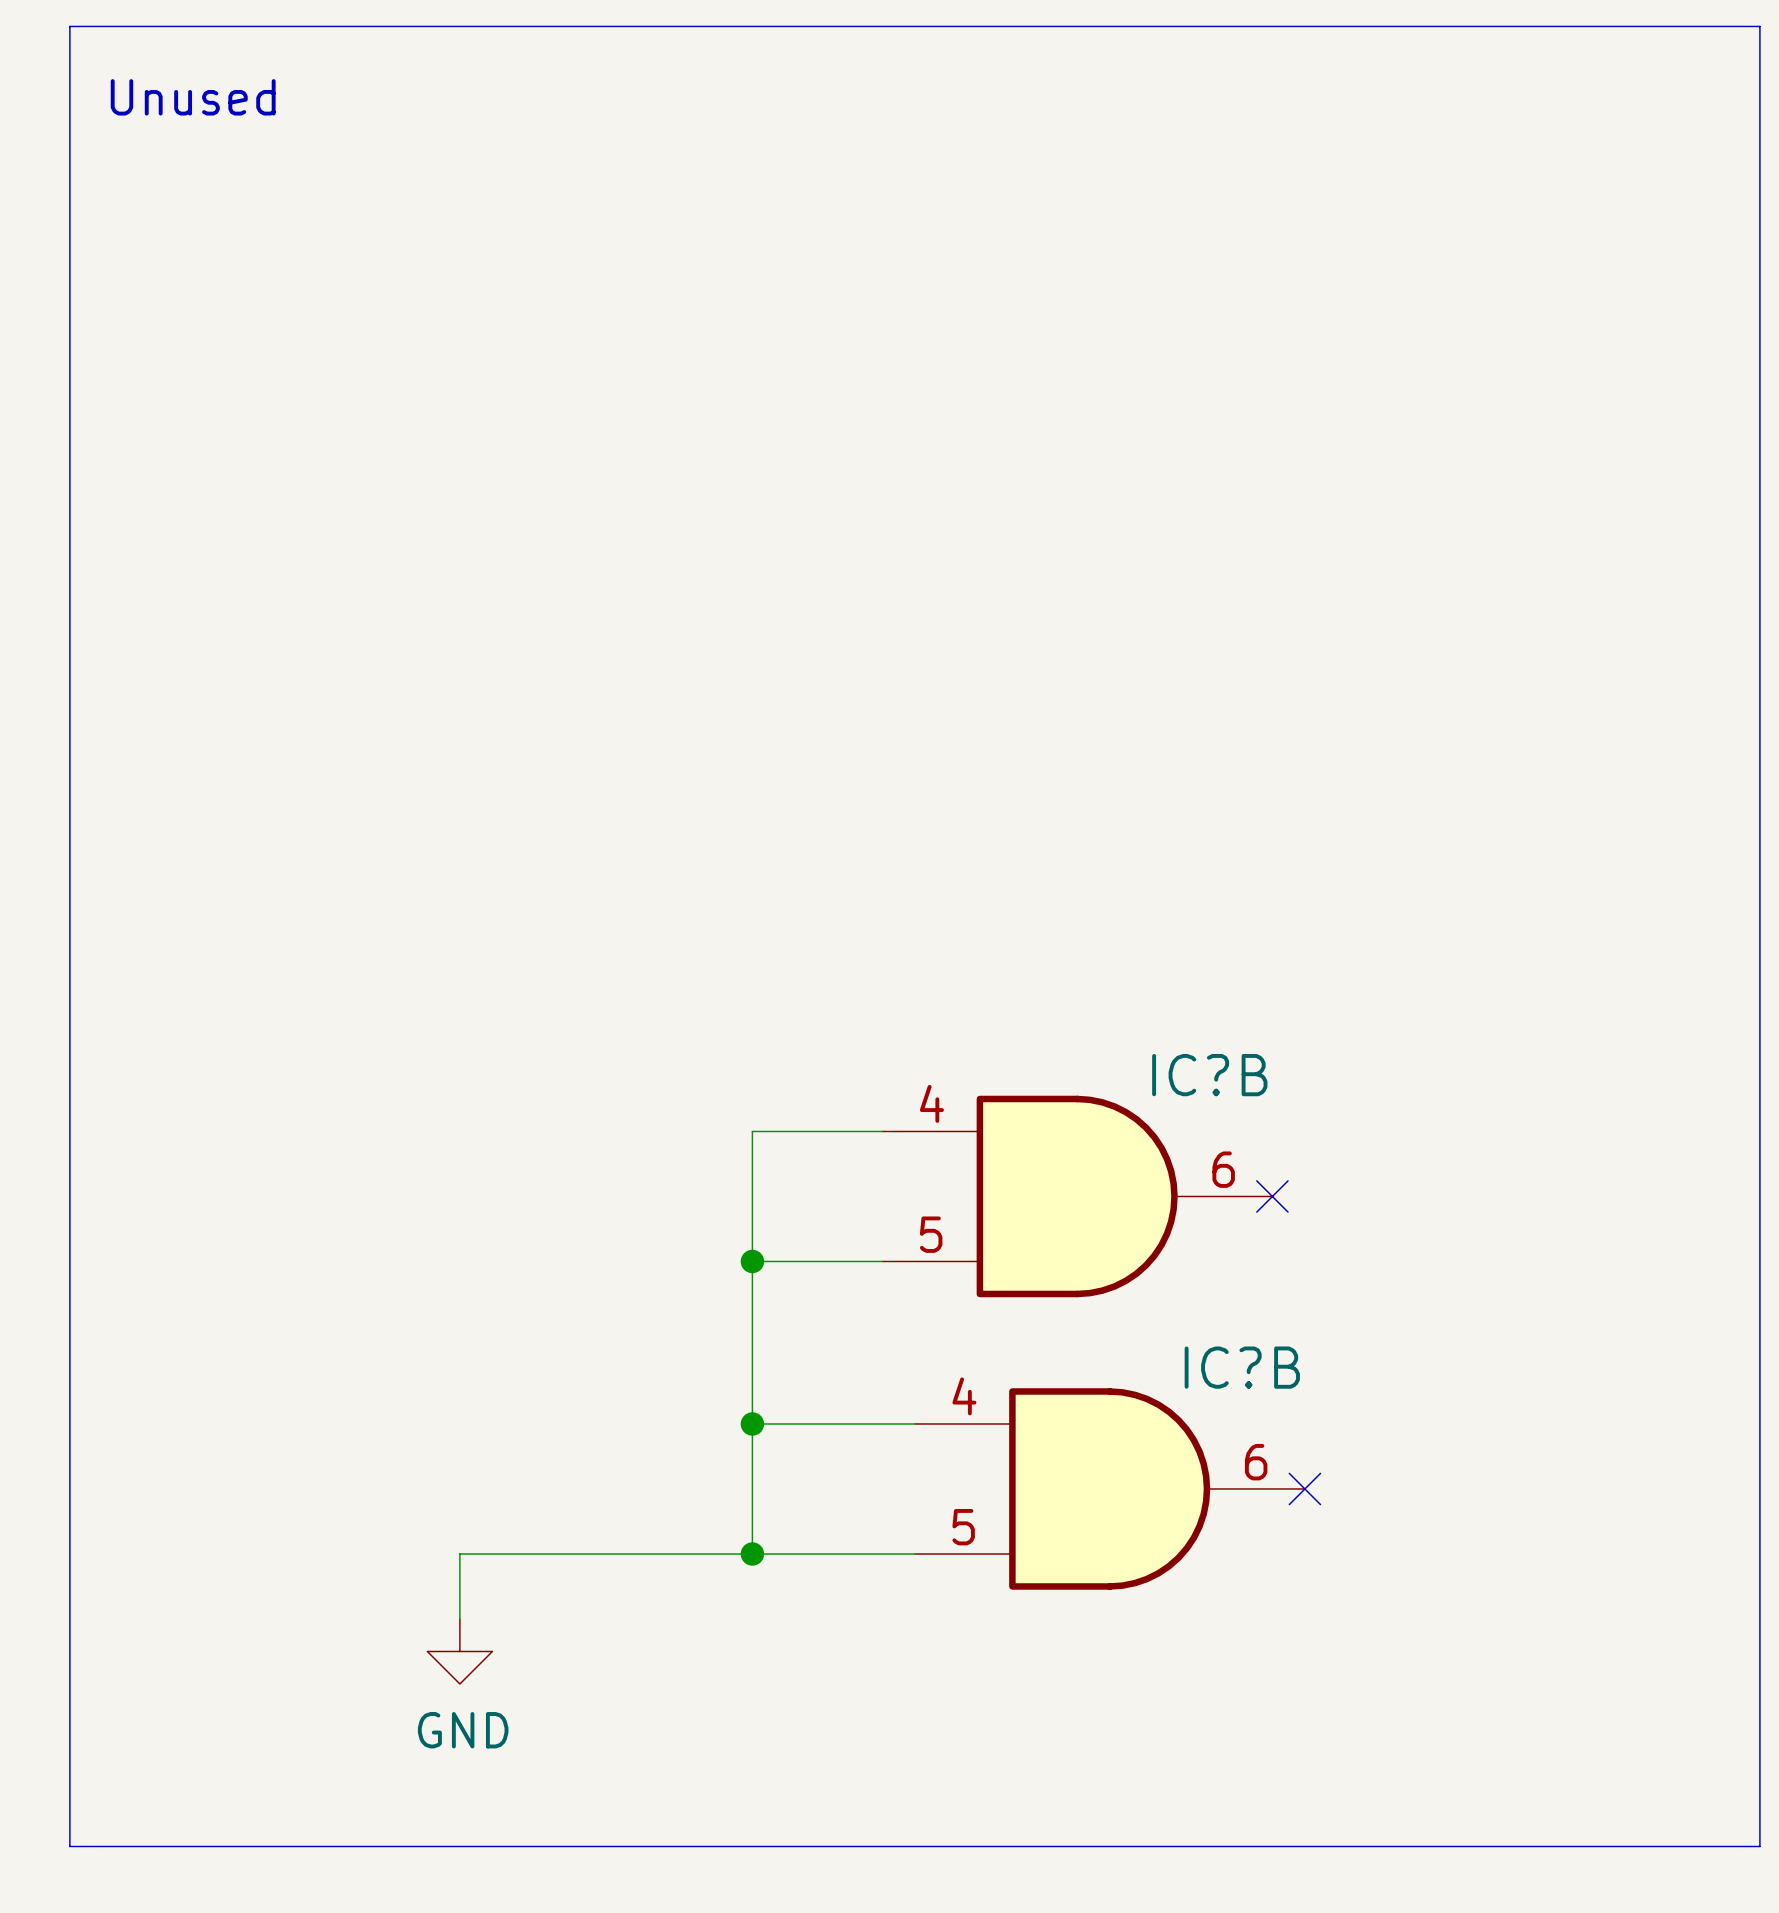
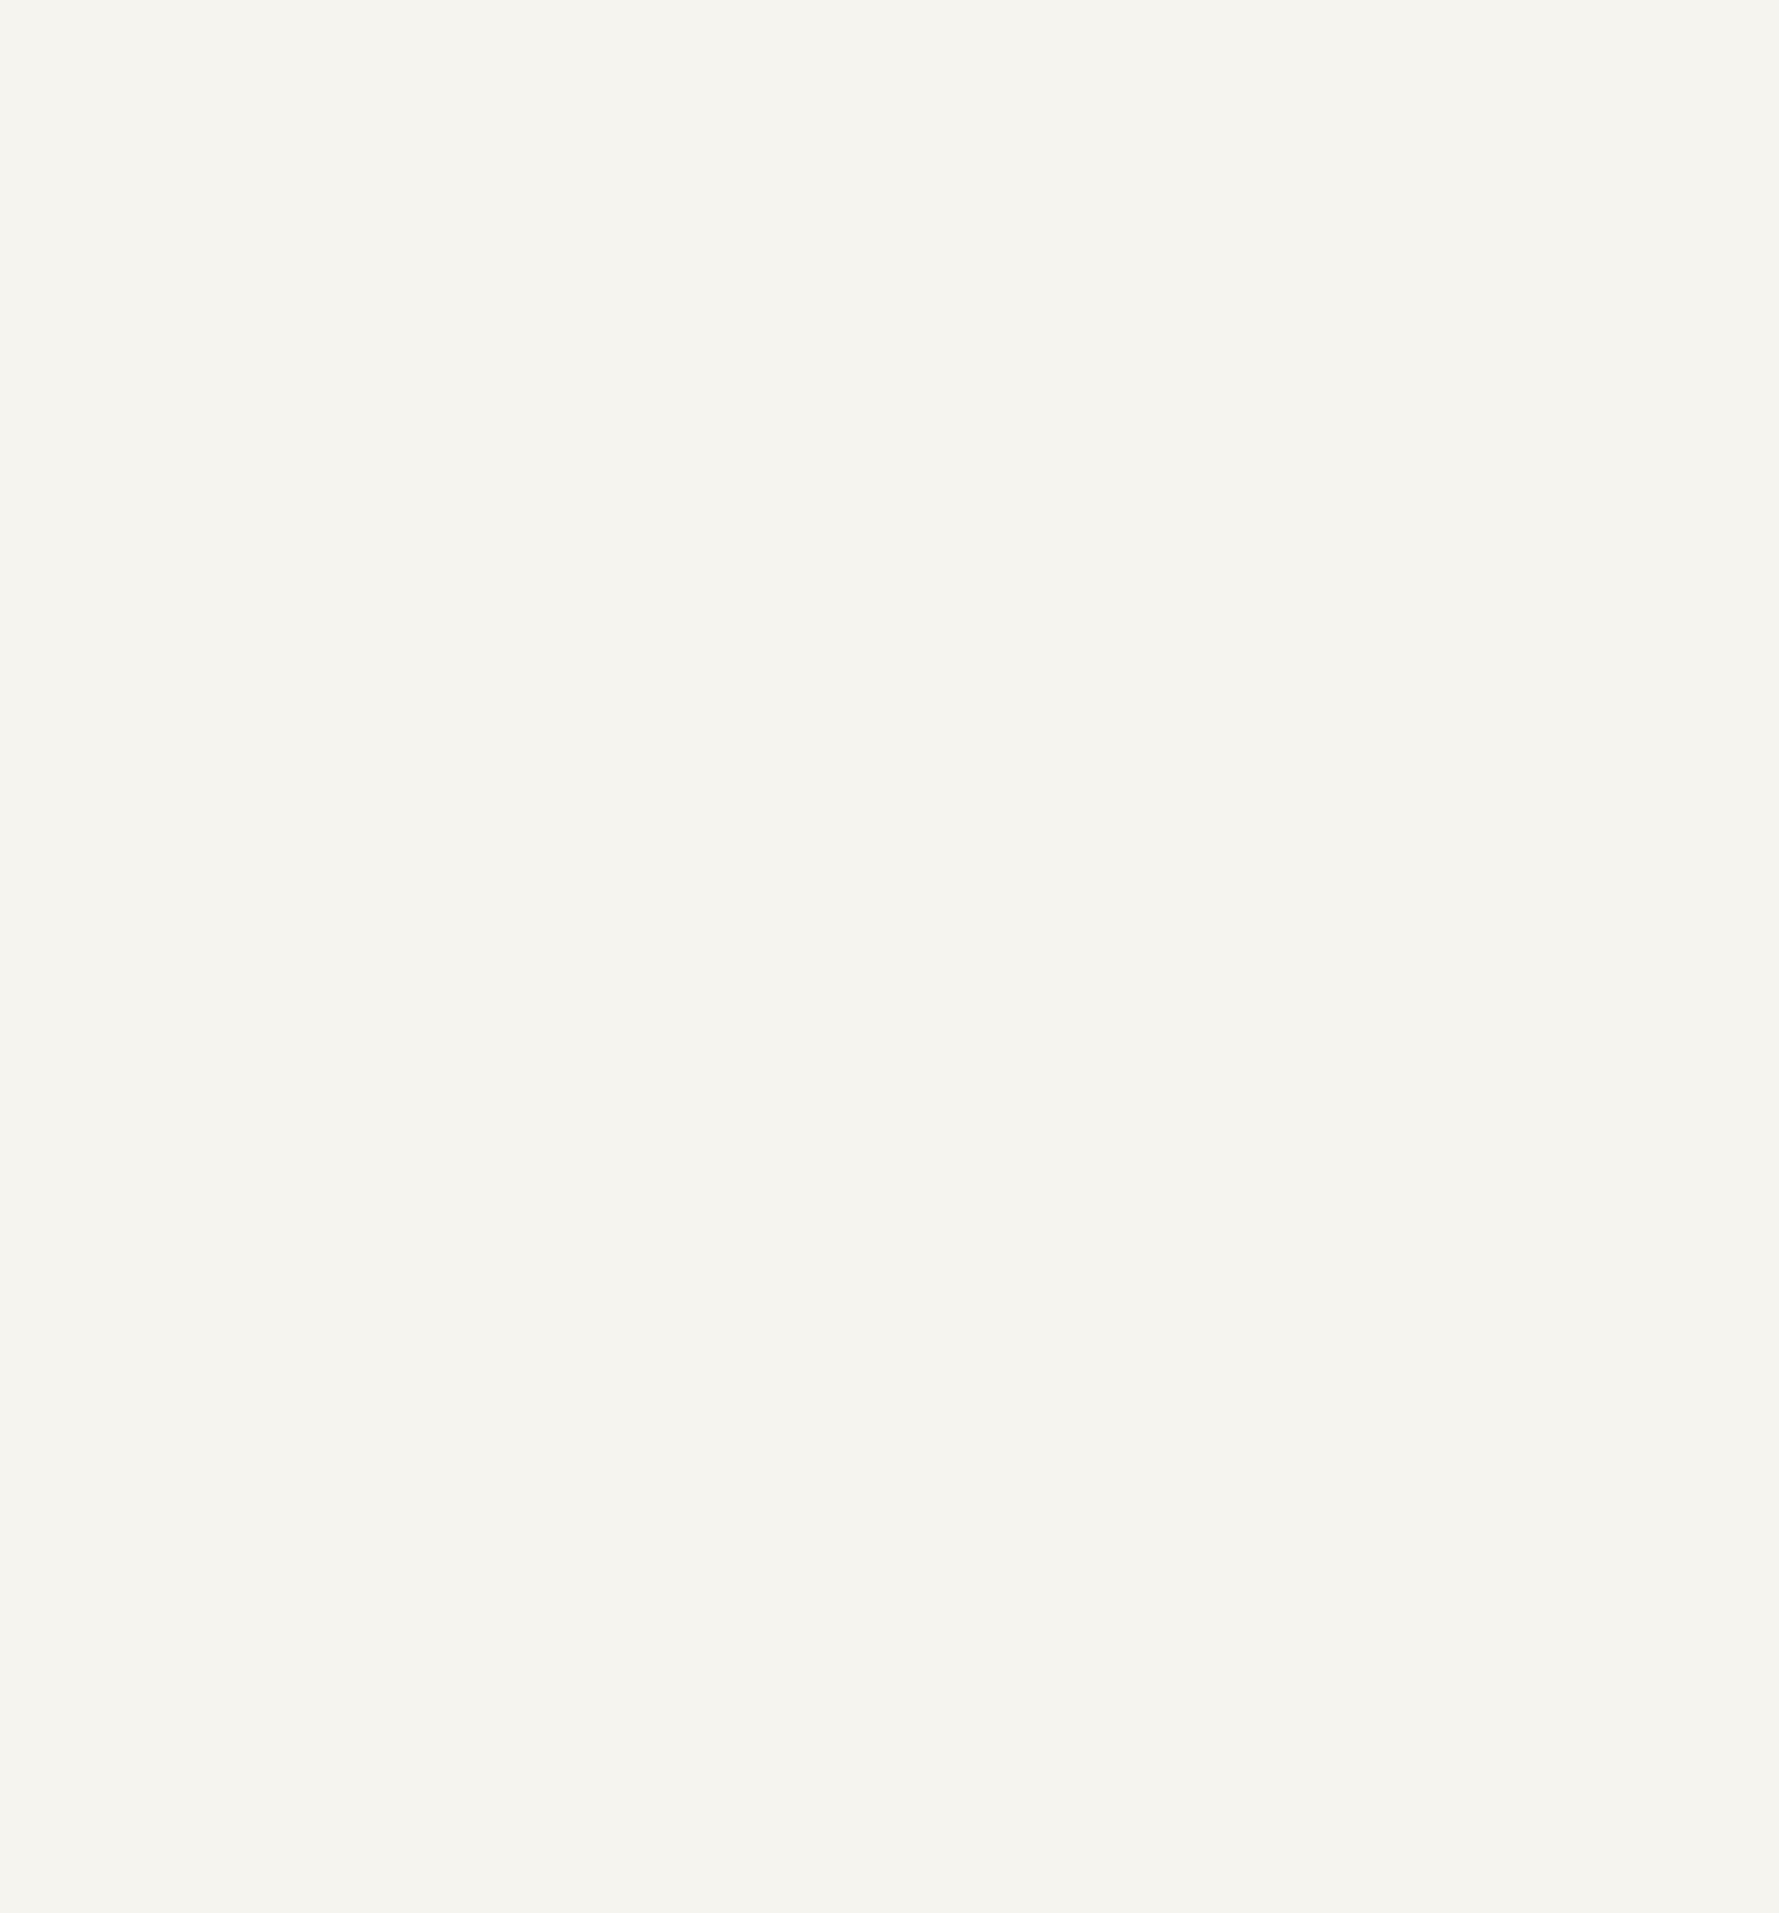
line: (69, 26) (1759, 26) (1759, 1846) (69, 1846) (69, 26) -> none
text: Unused (193, 97) -> none
wire: (882, 1131) (752, 1131) (752, 1553) -> none
IC?B: (1077, 1196) -> none
no-connect mark: (1272, 1196) -> none
wire: (752, 1261) (882, 1261) -> none
junction: (752, 1261) -> none
wire: (752, 1423) (914, 1423) -> none
junction: (752, 1423) -> none
IC?B: (1109, 1488) -> none
no-connect mark: (1304, 1488) -> none
junction: (752, 1553) -> none
wire: (914, 1553) (459, 1553) (459, 1618) -> none
power symbol: GND (459, 1651) -> none

